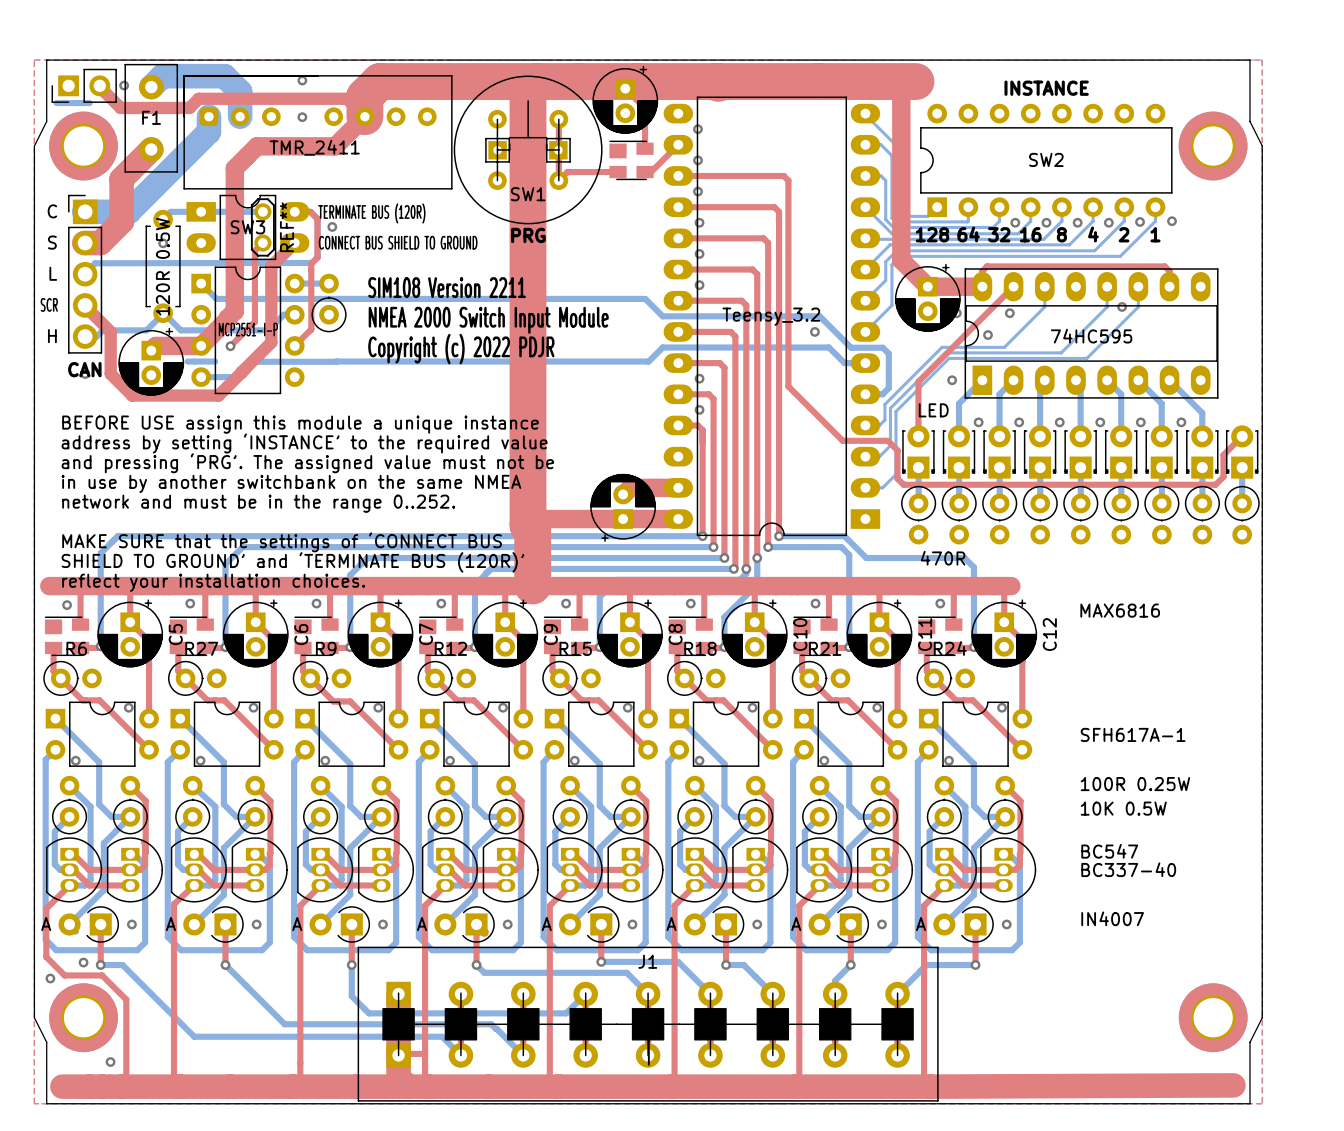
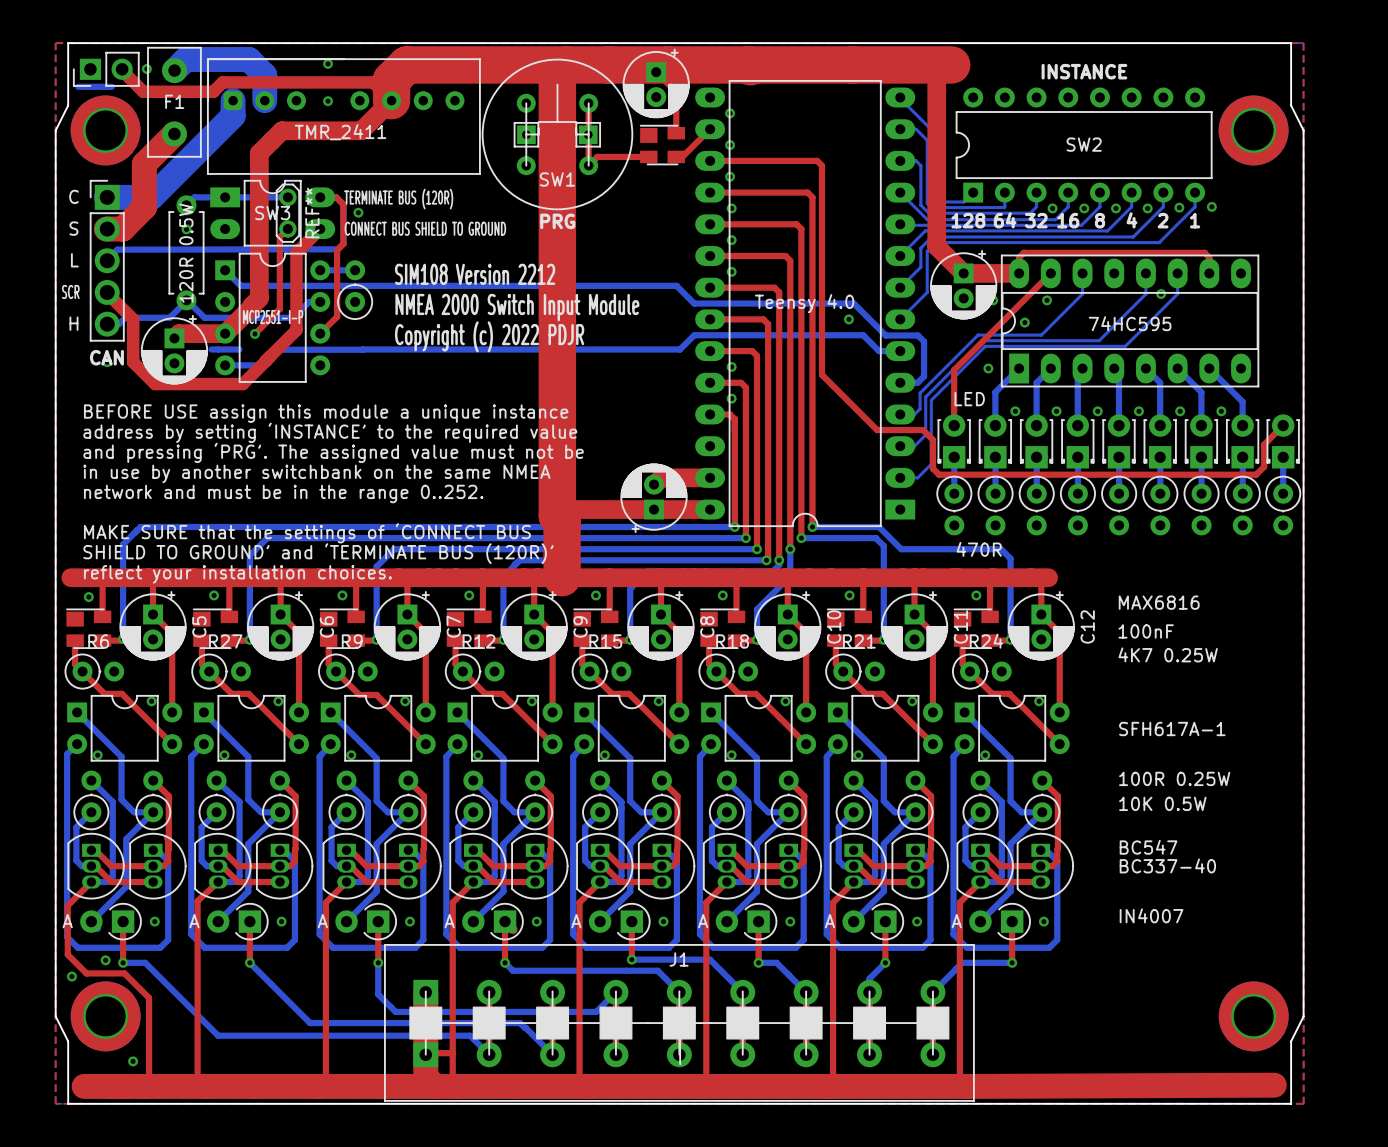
text: SIM108 Version 2211 (447, 287) -> SIM108 Version 2212 (475, 274)
part value: Teensy_3.2 (771, 316) -> Teensy 4.0 (804, 303)
drawing: none -> [1118, 624, 1218, 663]

